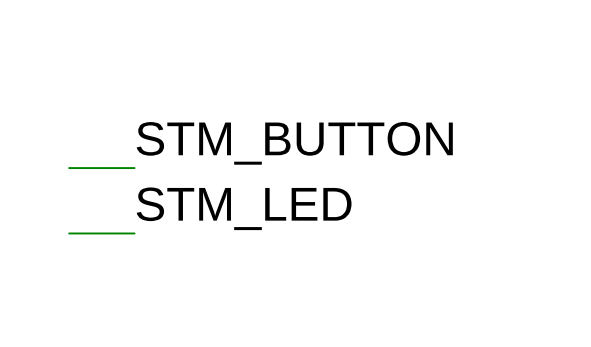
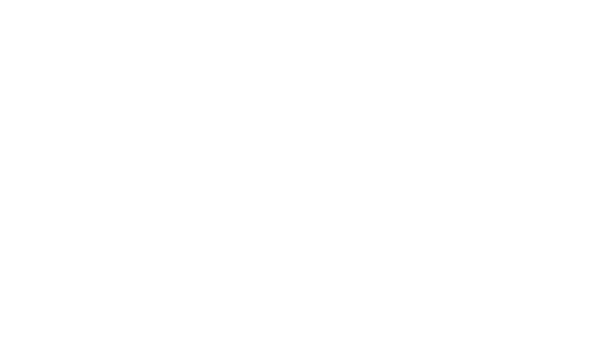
label: STM_BUTTON (294, 143) -> none
wire: (69, 168) (134, 168) -> none
label: STM_LED (244, 208) -> none
wire: (69, 233) (134, 233) -> none

